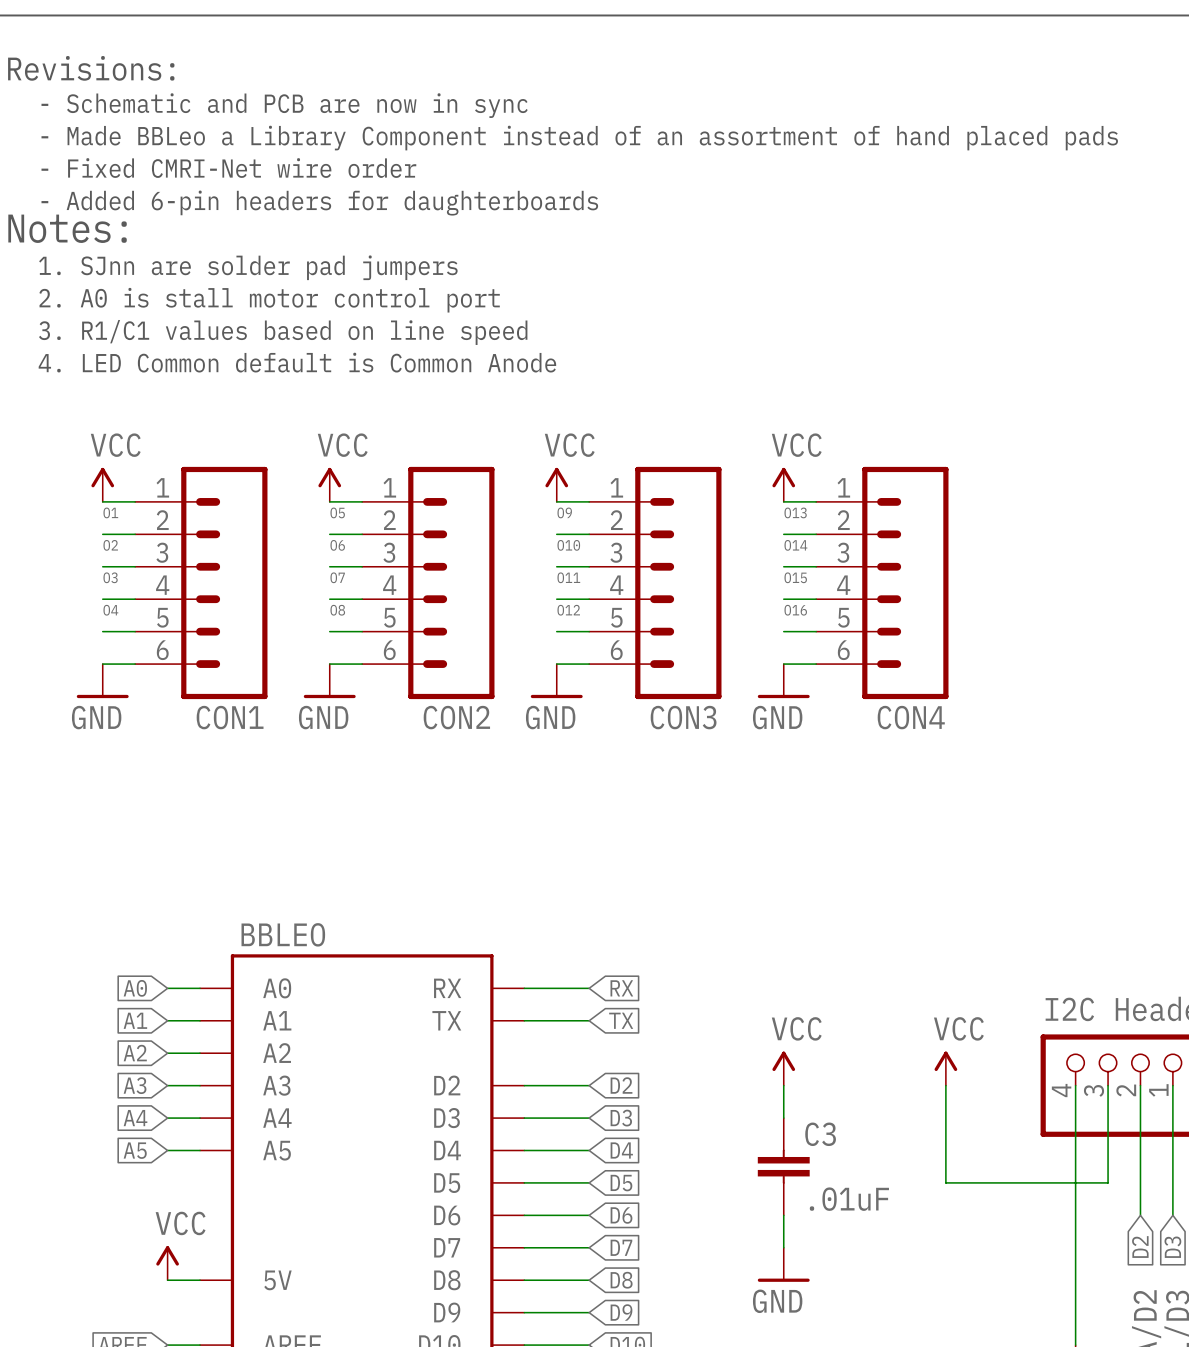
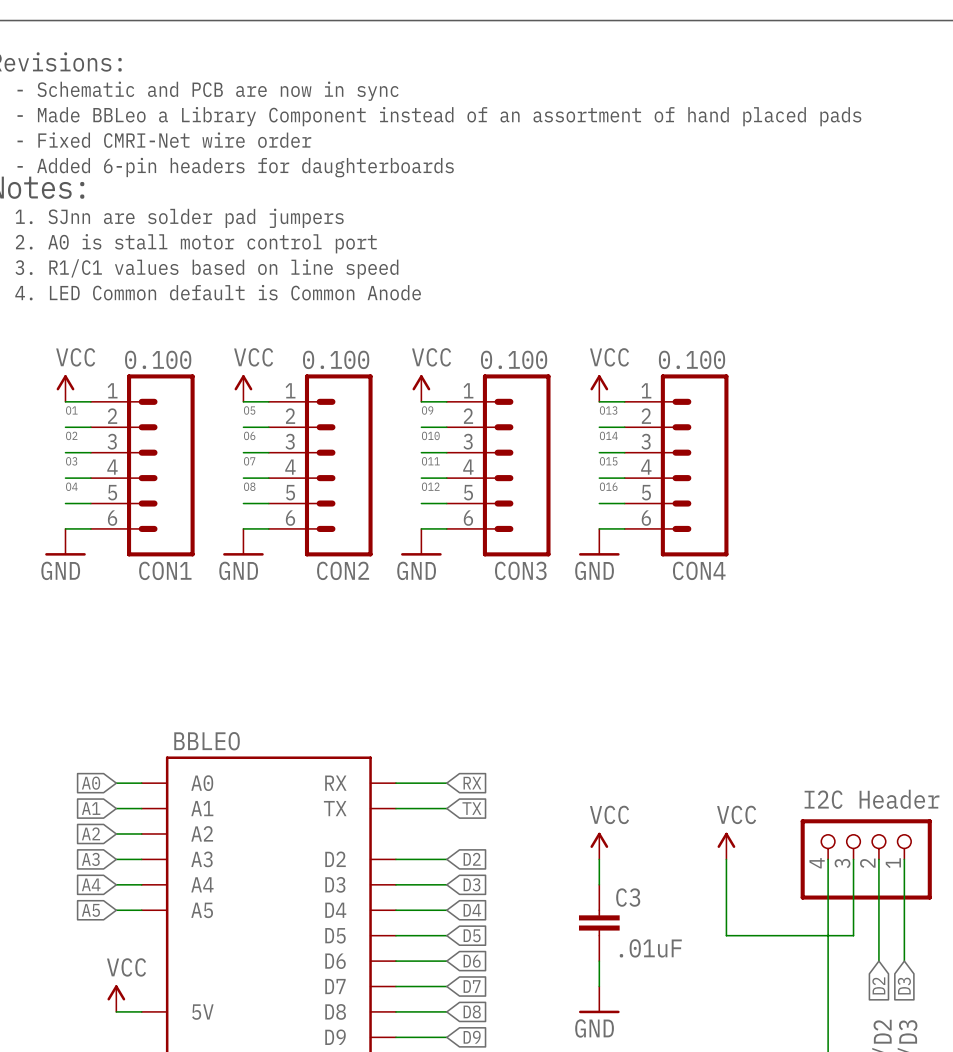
CON1 value: none -> 0.100 (158, 359)
CON2 value: none -> 0.100 (336, 359)
CON3 value: none -> 0.100 (514, 359)
CON4 value: none -> 0.100 (692, 359)

